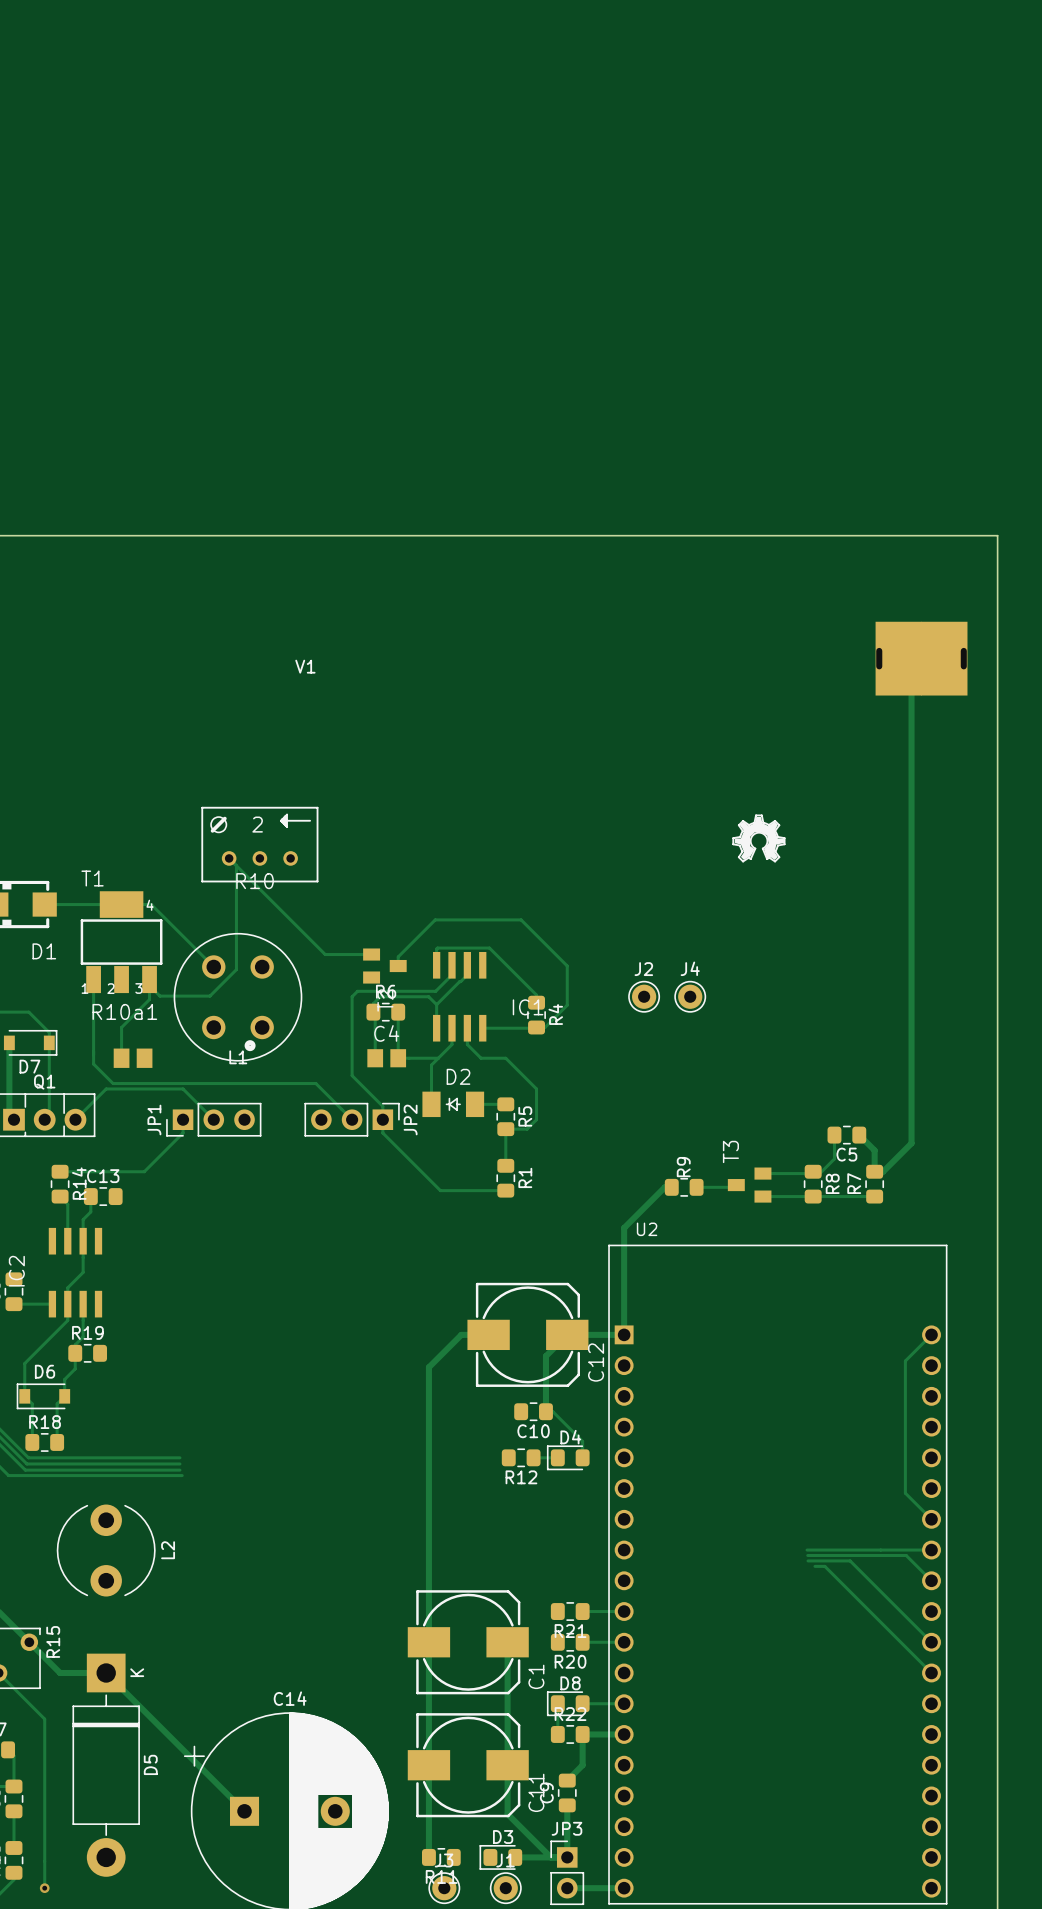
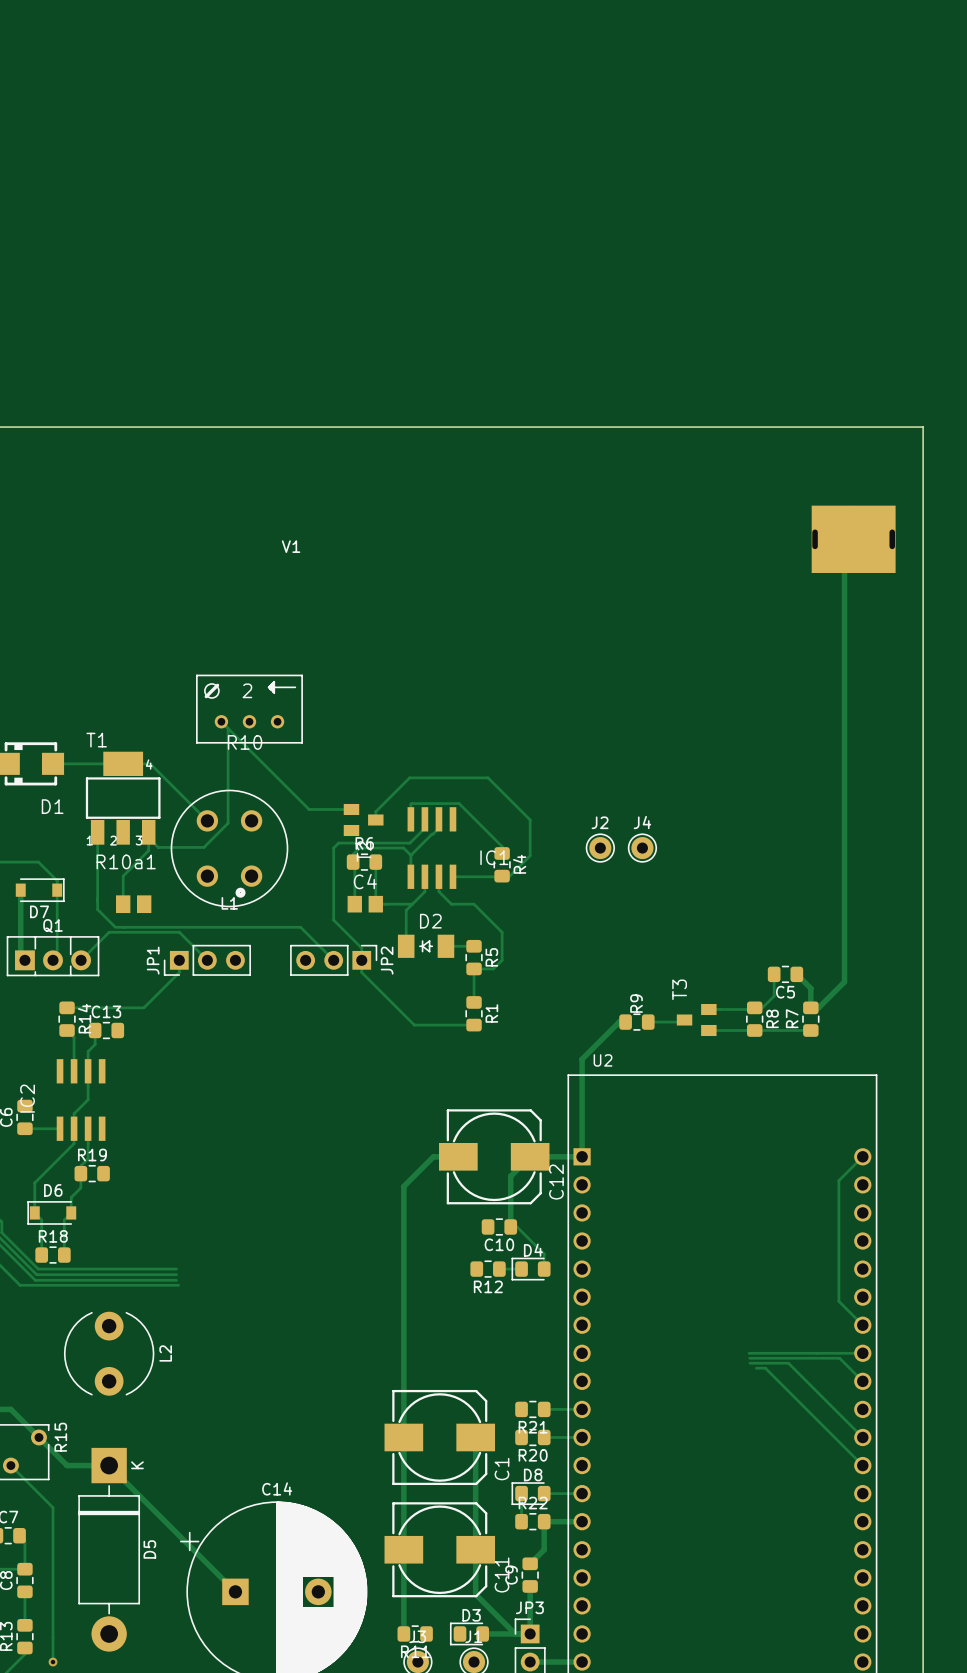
drawing: [732, 814, 786, 863] -> none

